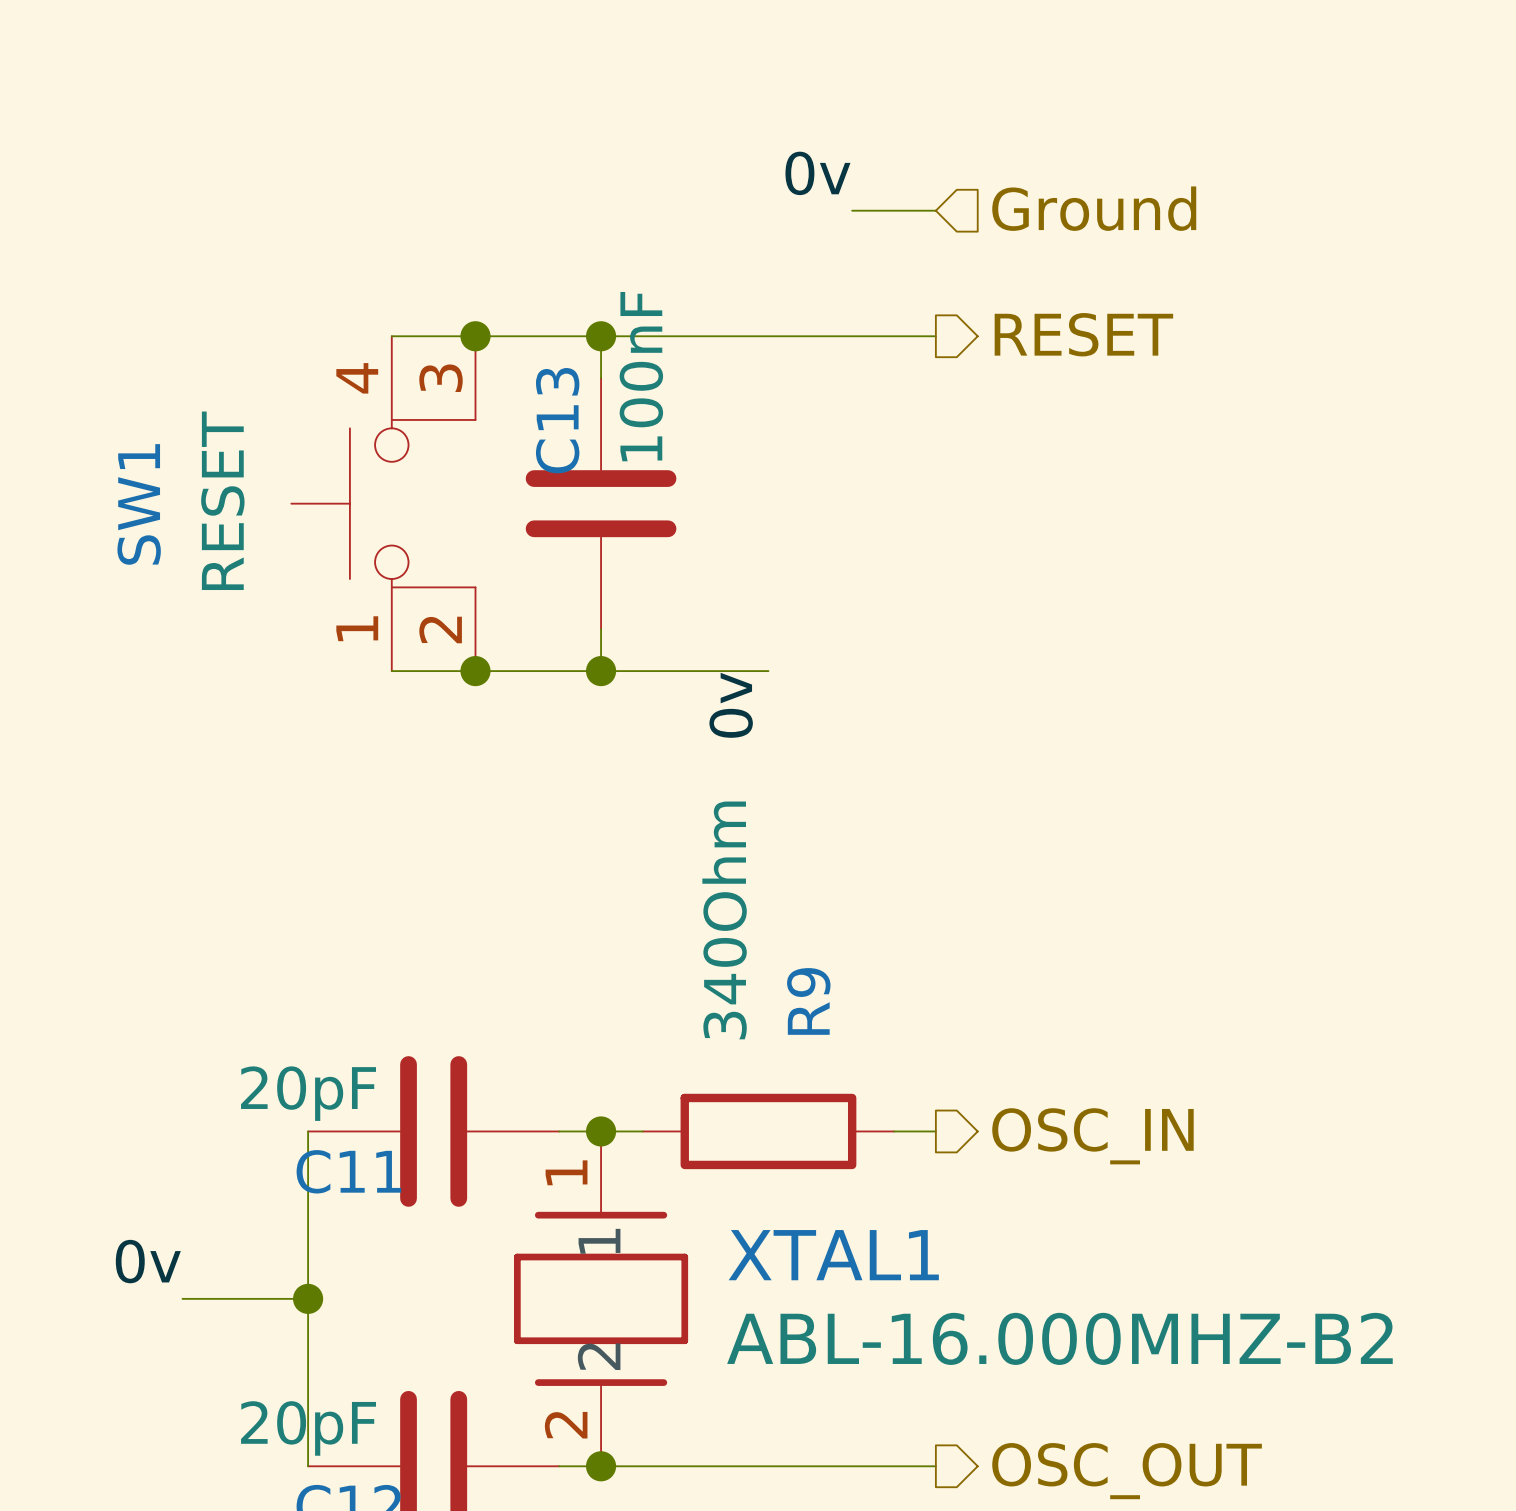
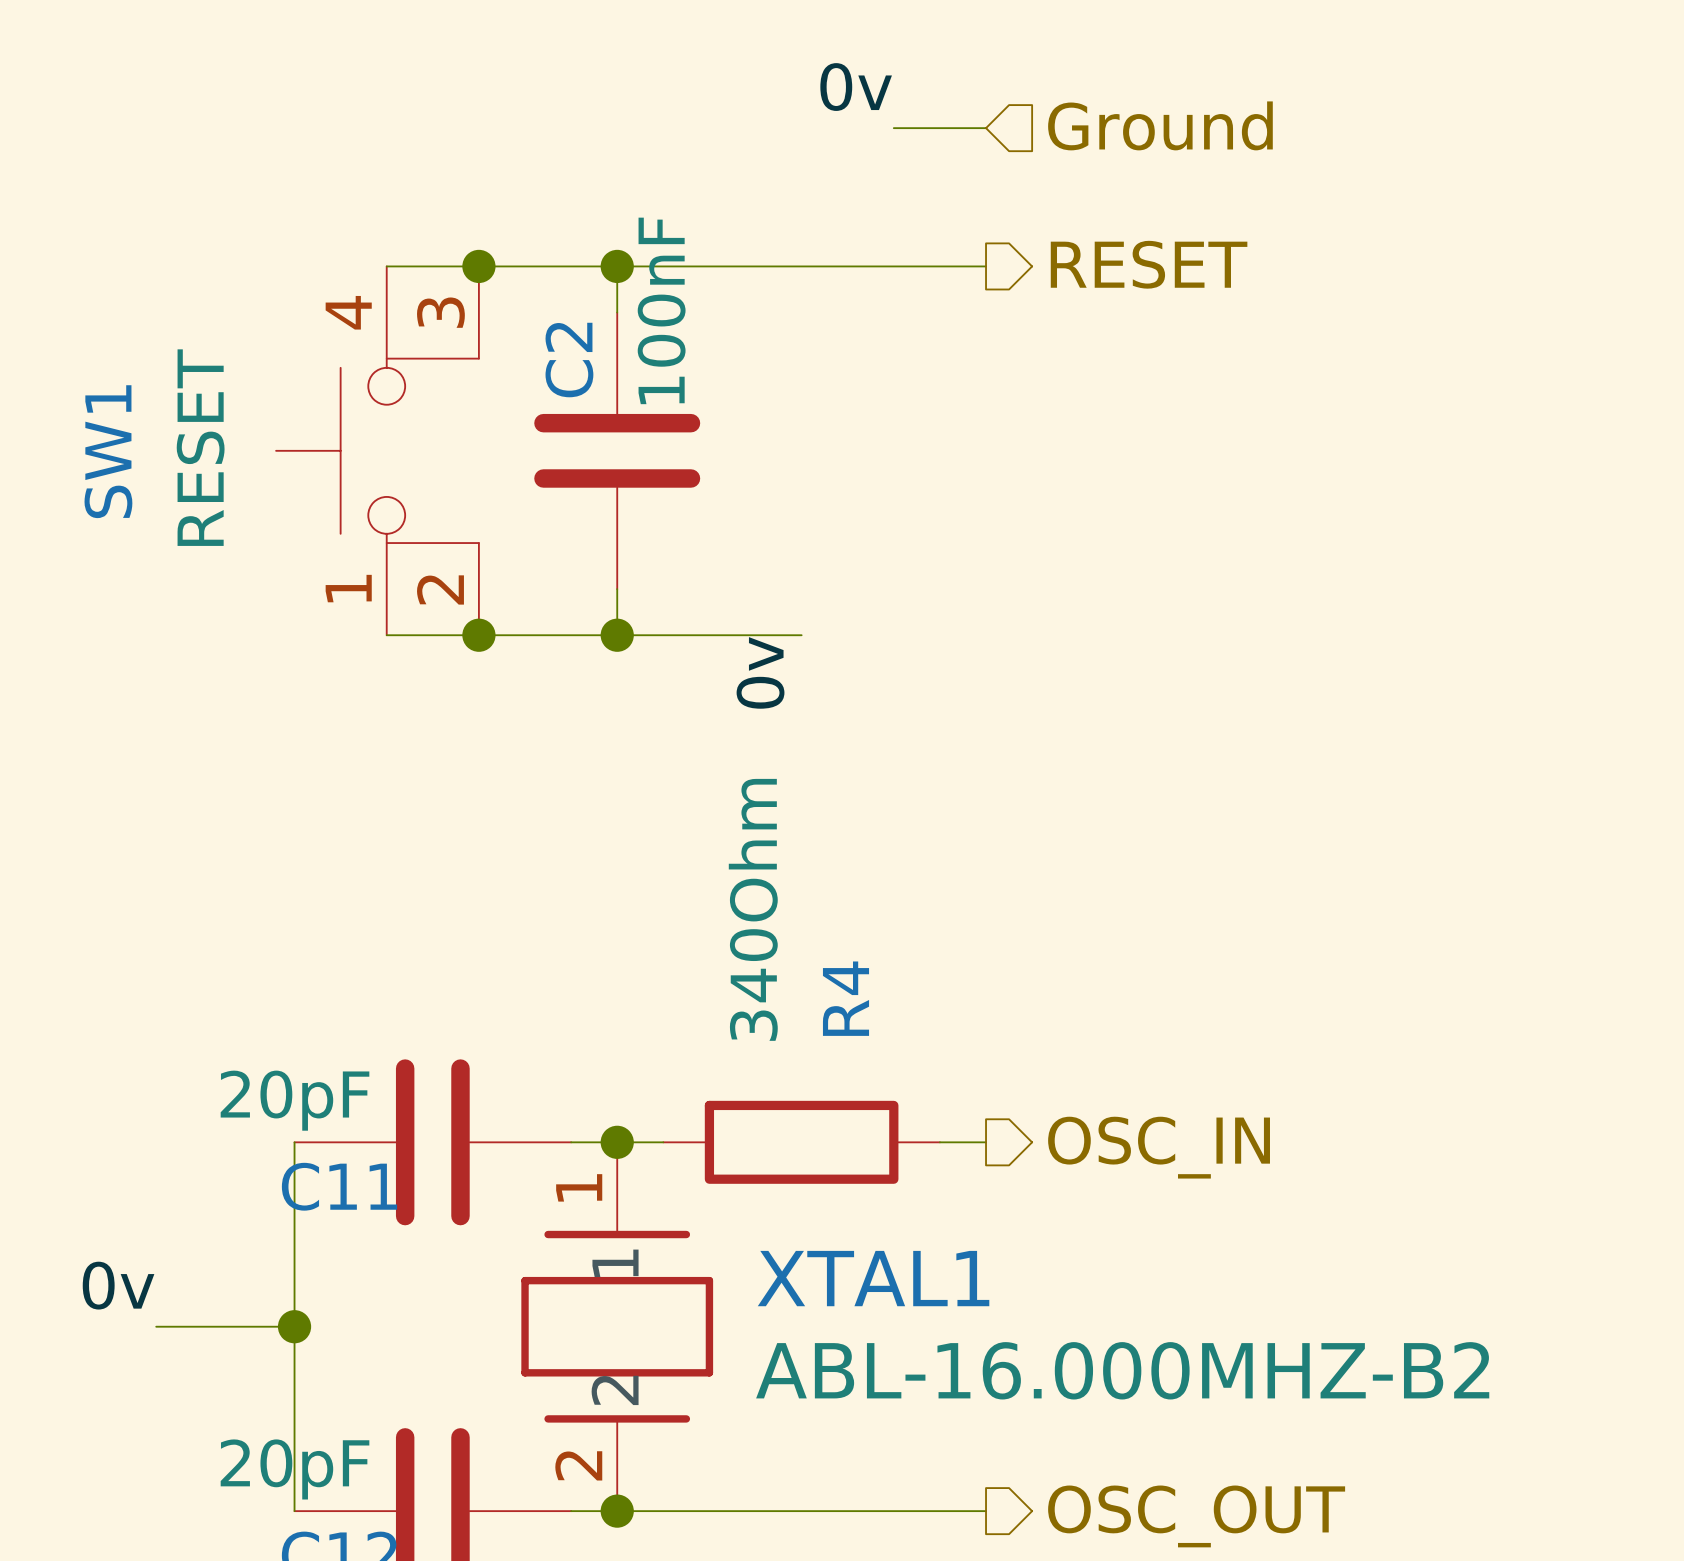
C13 name: C13 (557, 420) -> C2 (569, 360)
R9 name: R9 (808, 1001) -> R4 (846, 998)

